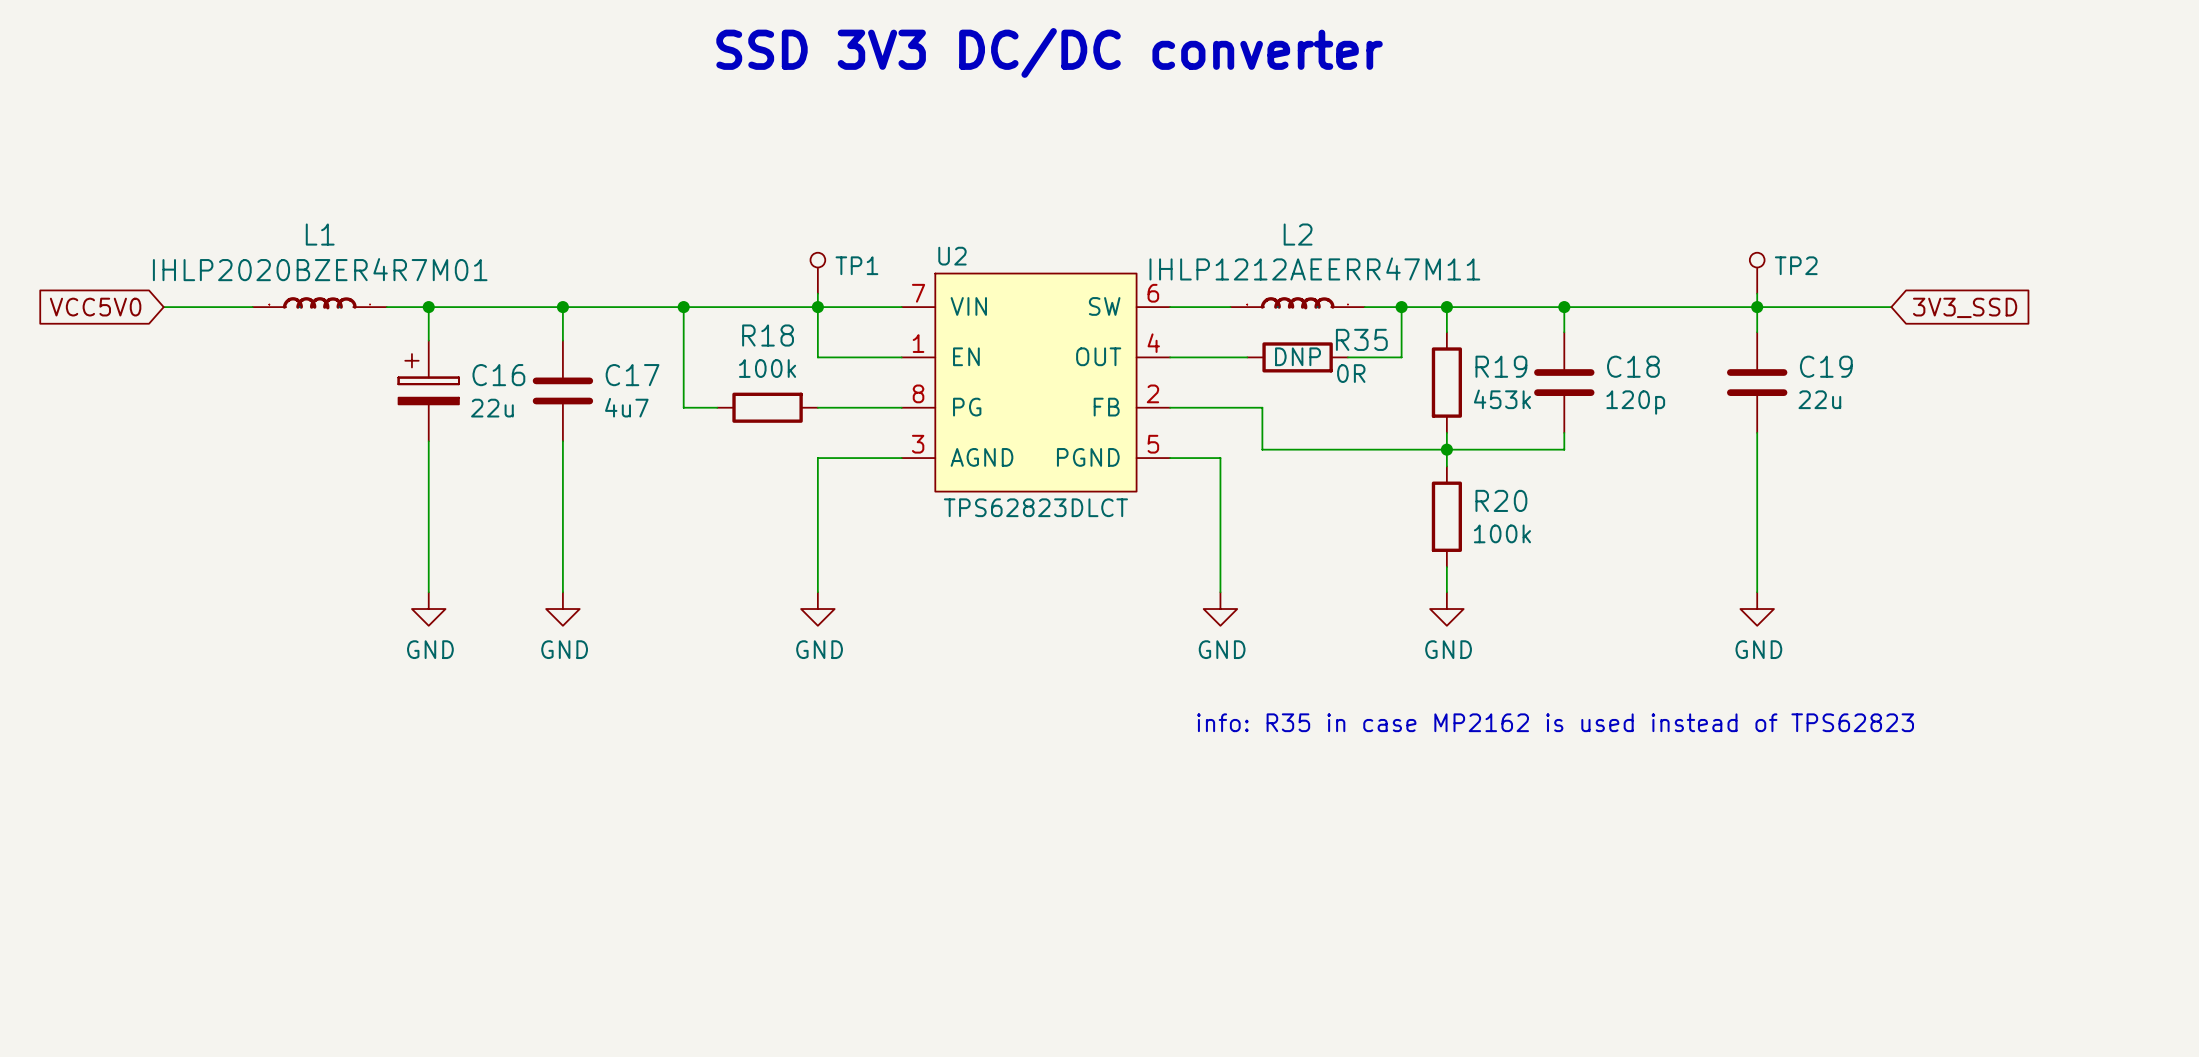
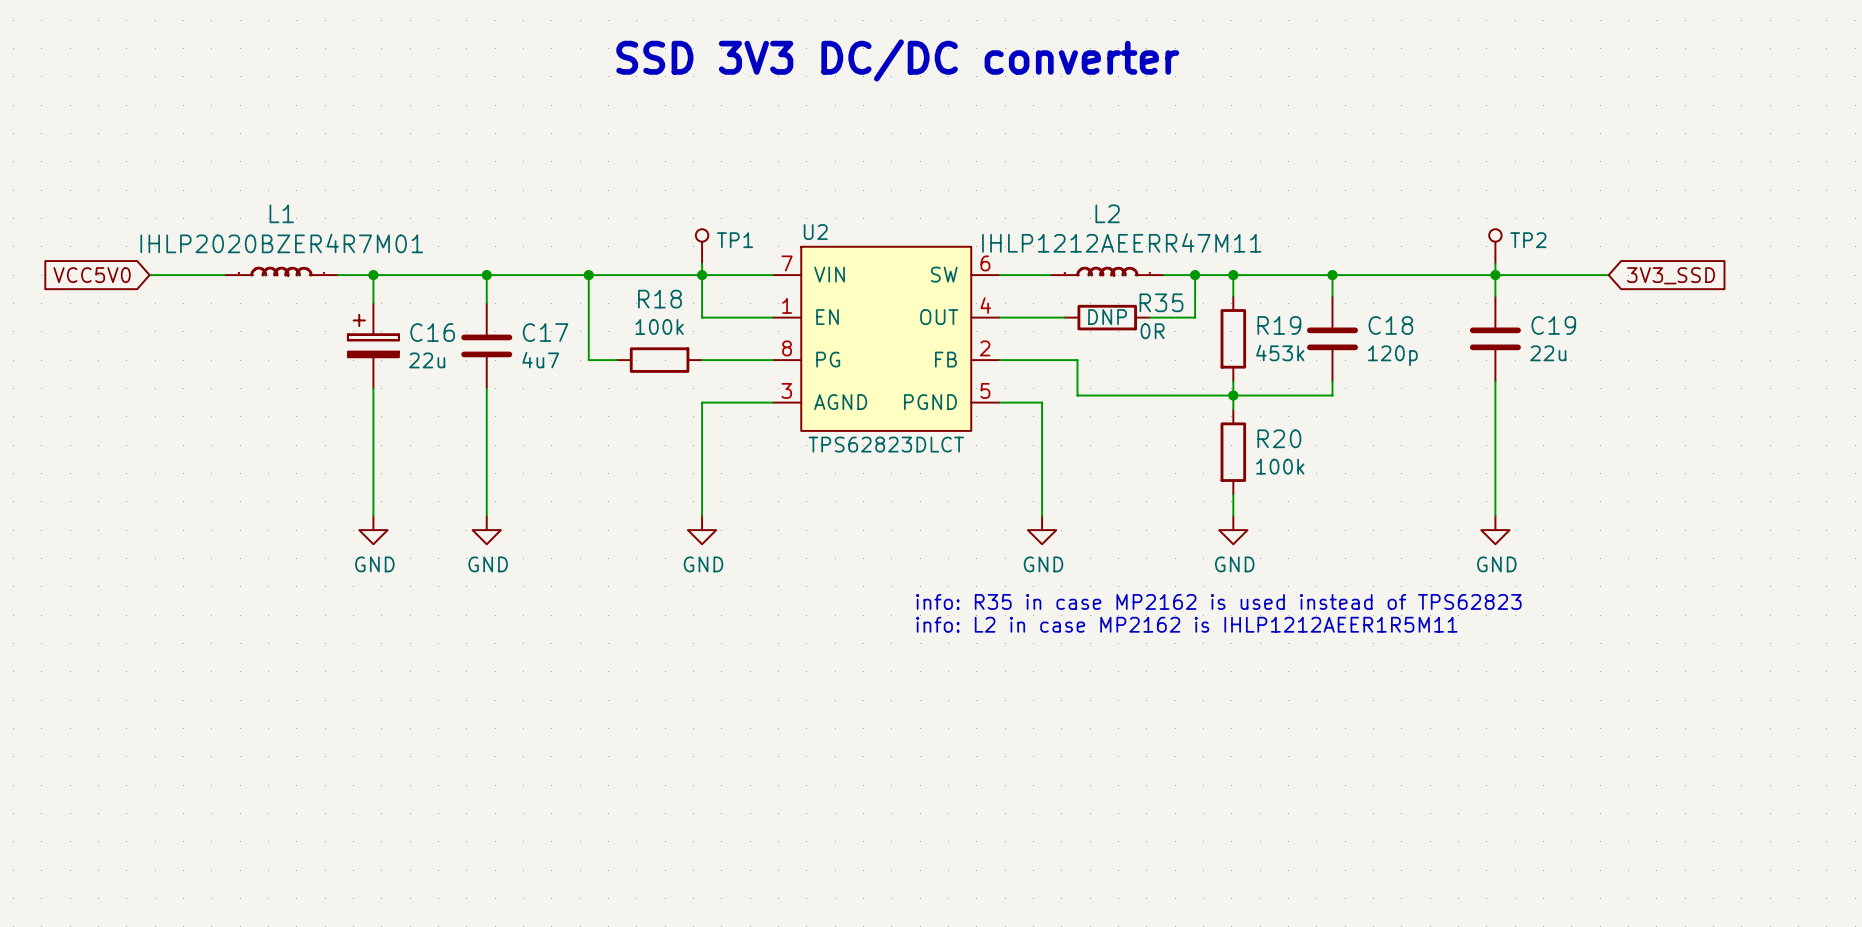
text: none -> info: L2 in case MP2162 is IHLP1212AEER1R5M11 (1186, 624)
text position: info: R35 in case MP2162 is used instead of TPS62823 (1555, 722) -> info: R35 in case MP2162 is used instead of TPS62823 (1218, 601)

